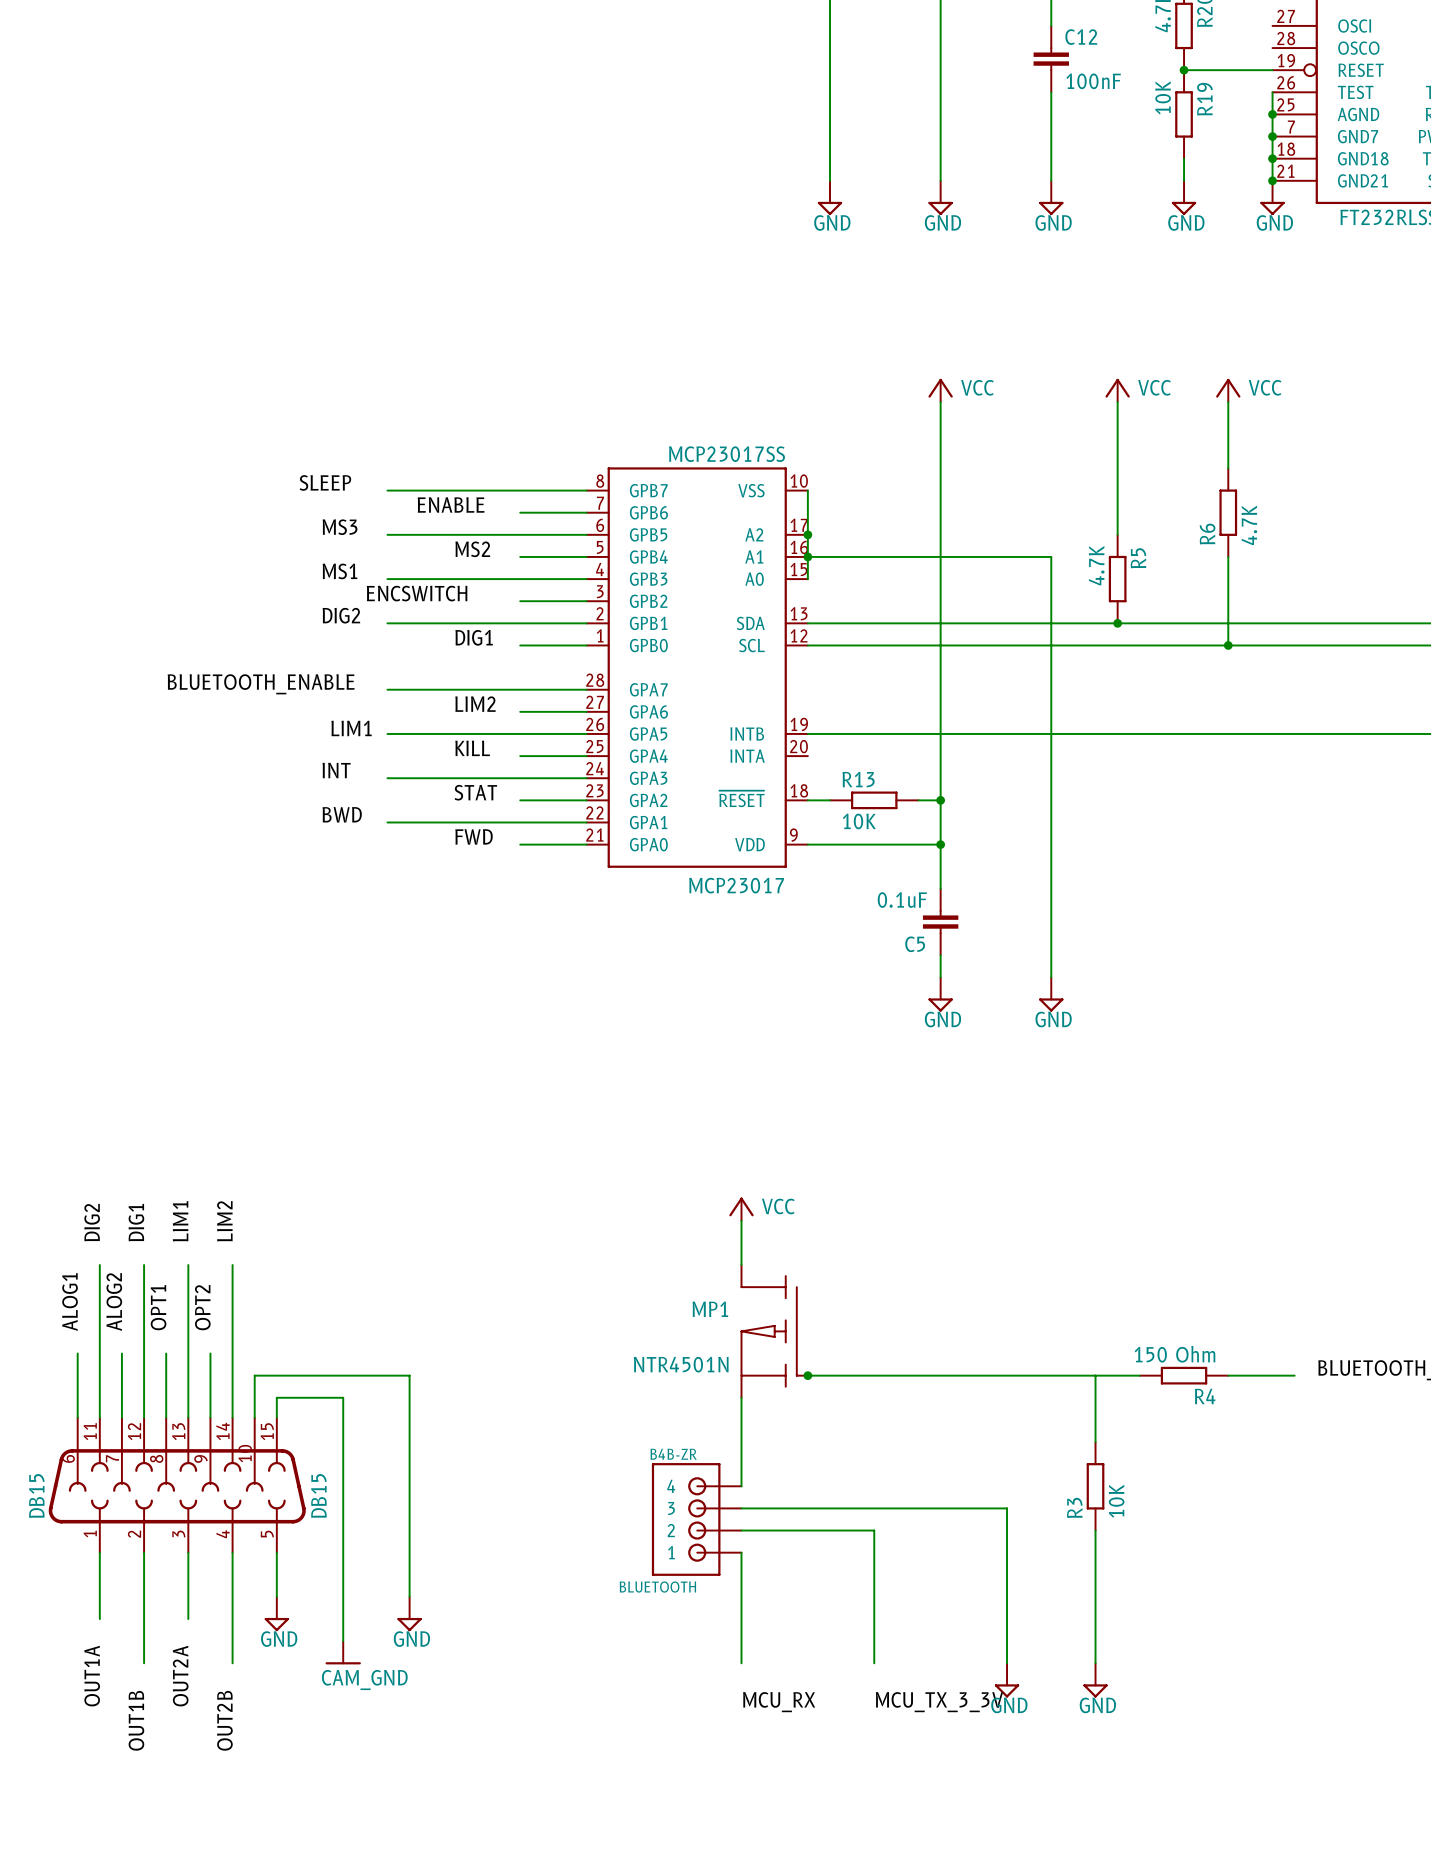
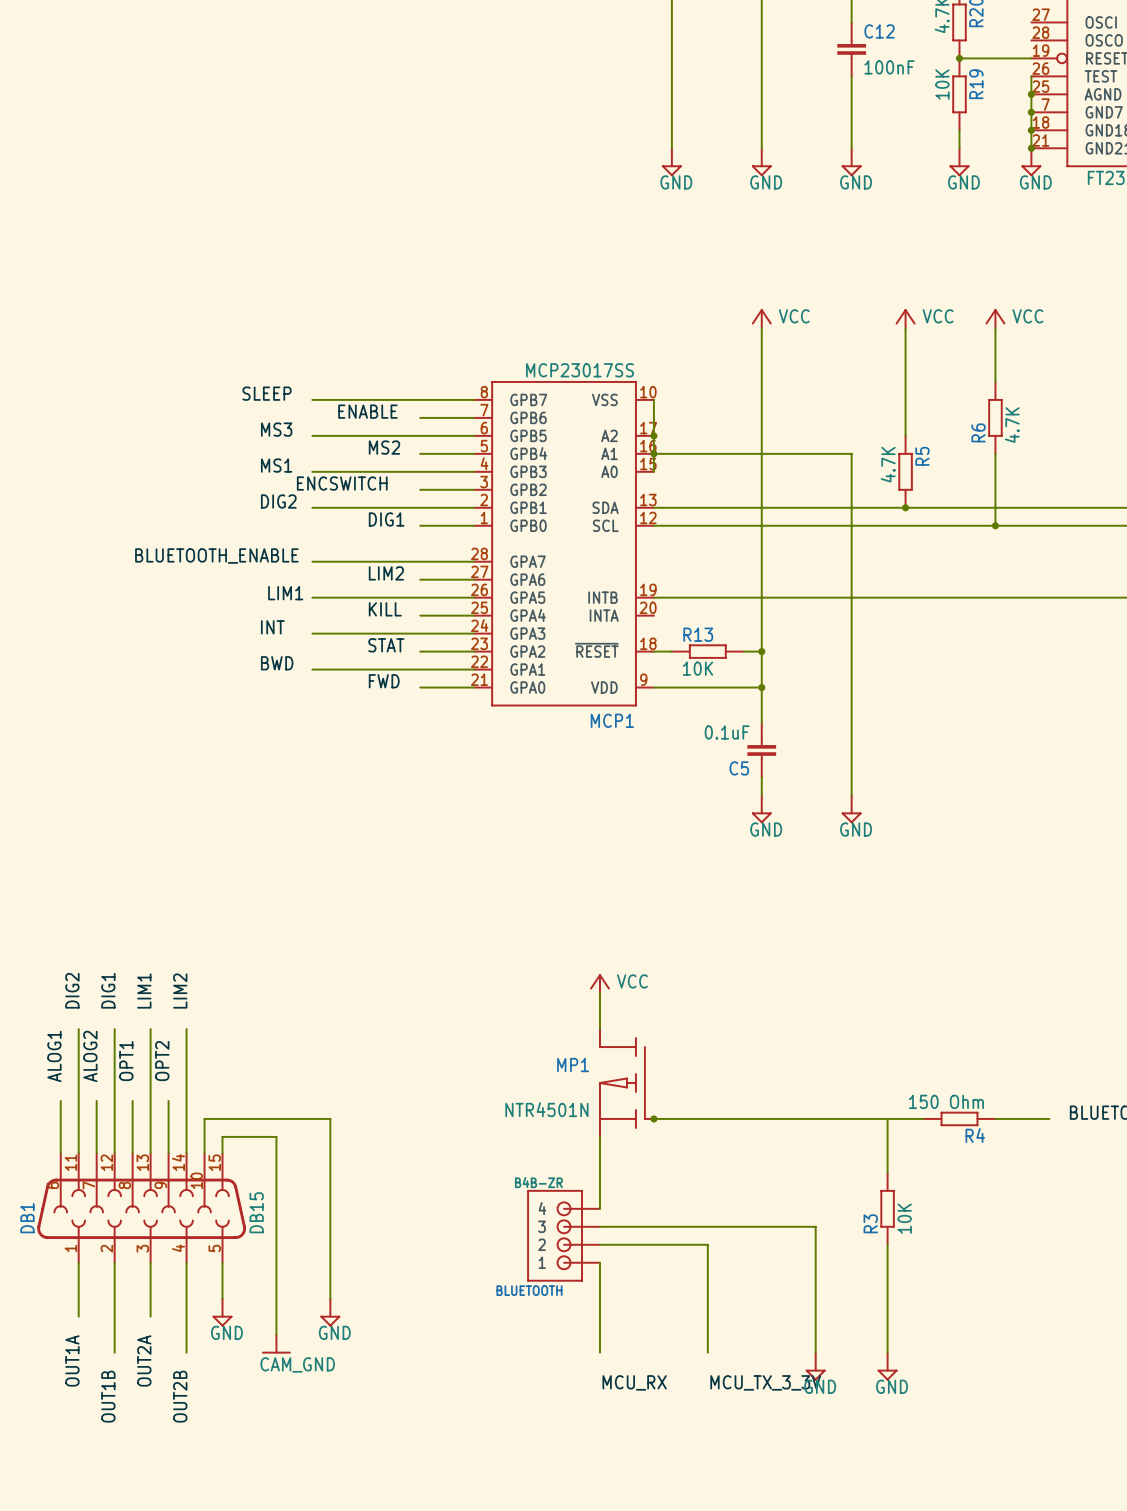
MCP23017 name: MCP23017 (736, 885) -> MCP1 (612, 720)
DB15 name: DB15 (36, 1496) -> DB1 (27, 1218)

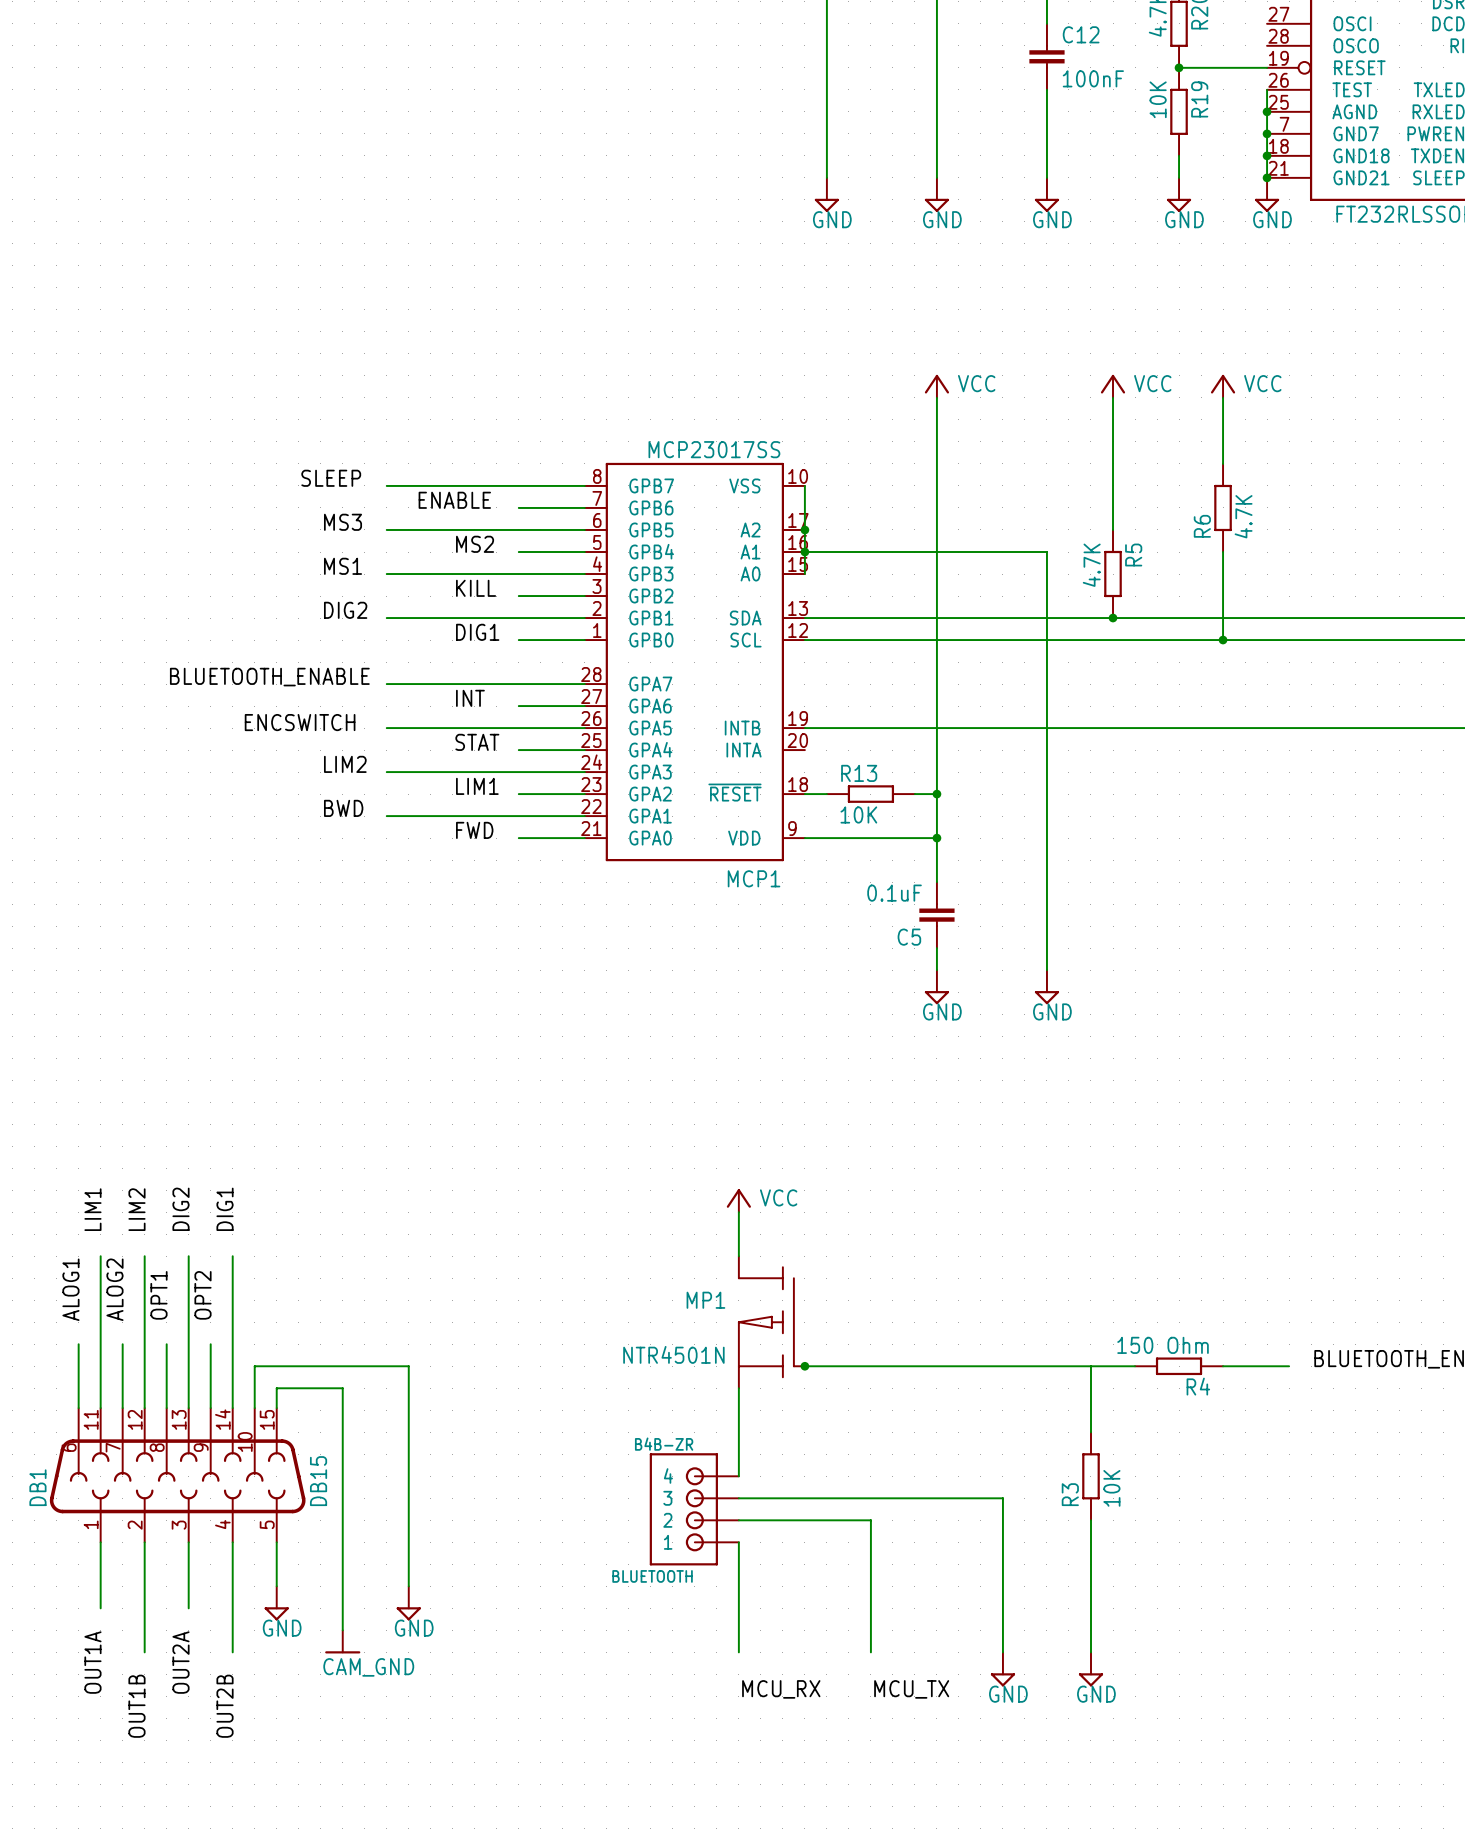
label position: ENCSWITCH (342, 483) -> ENCSWITCH (300, 722)
label: none -> KILL (476, 588)
label: LIM2 (386, 573) -> INT (470, 698)
label: LIM1 (285, 593) -> none
label: KILL (385, 609) -> STAT (477, 742)
label: INT (272, 627) -> LIM2 (345, 764)
label: STAT (386, 645) -> LIM1 (477, 786)
label: DIG2 (72, 990) -> LIM1 (92, 1209)
label: DIG1 (108, 990) -> LIM2 (136, 1209)
label: LIM1 (144, 991) -> DIG2 (180, 1209)
label: LIM2 (180, 991) -> DIG1 (225, 1209)
label: MCU_TX_3_3V (765, 1382) -> MCU_TX (911, 1689)

